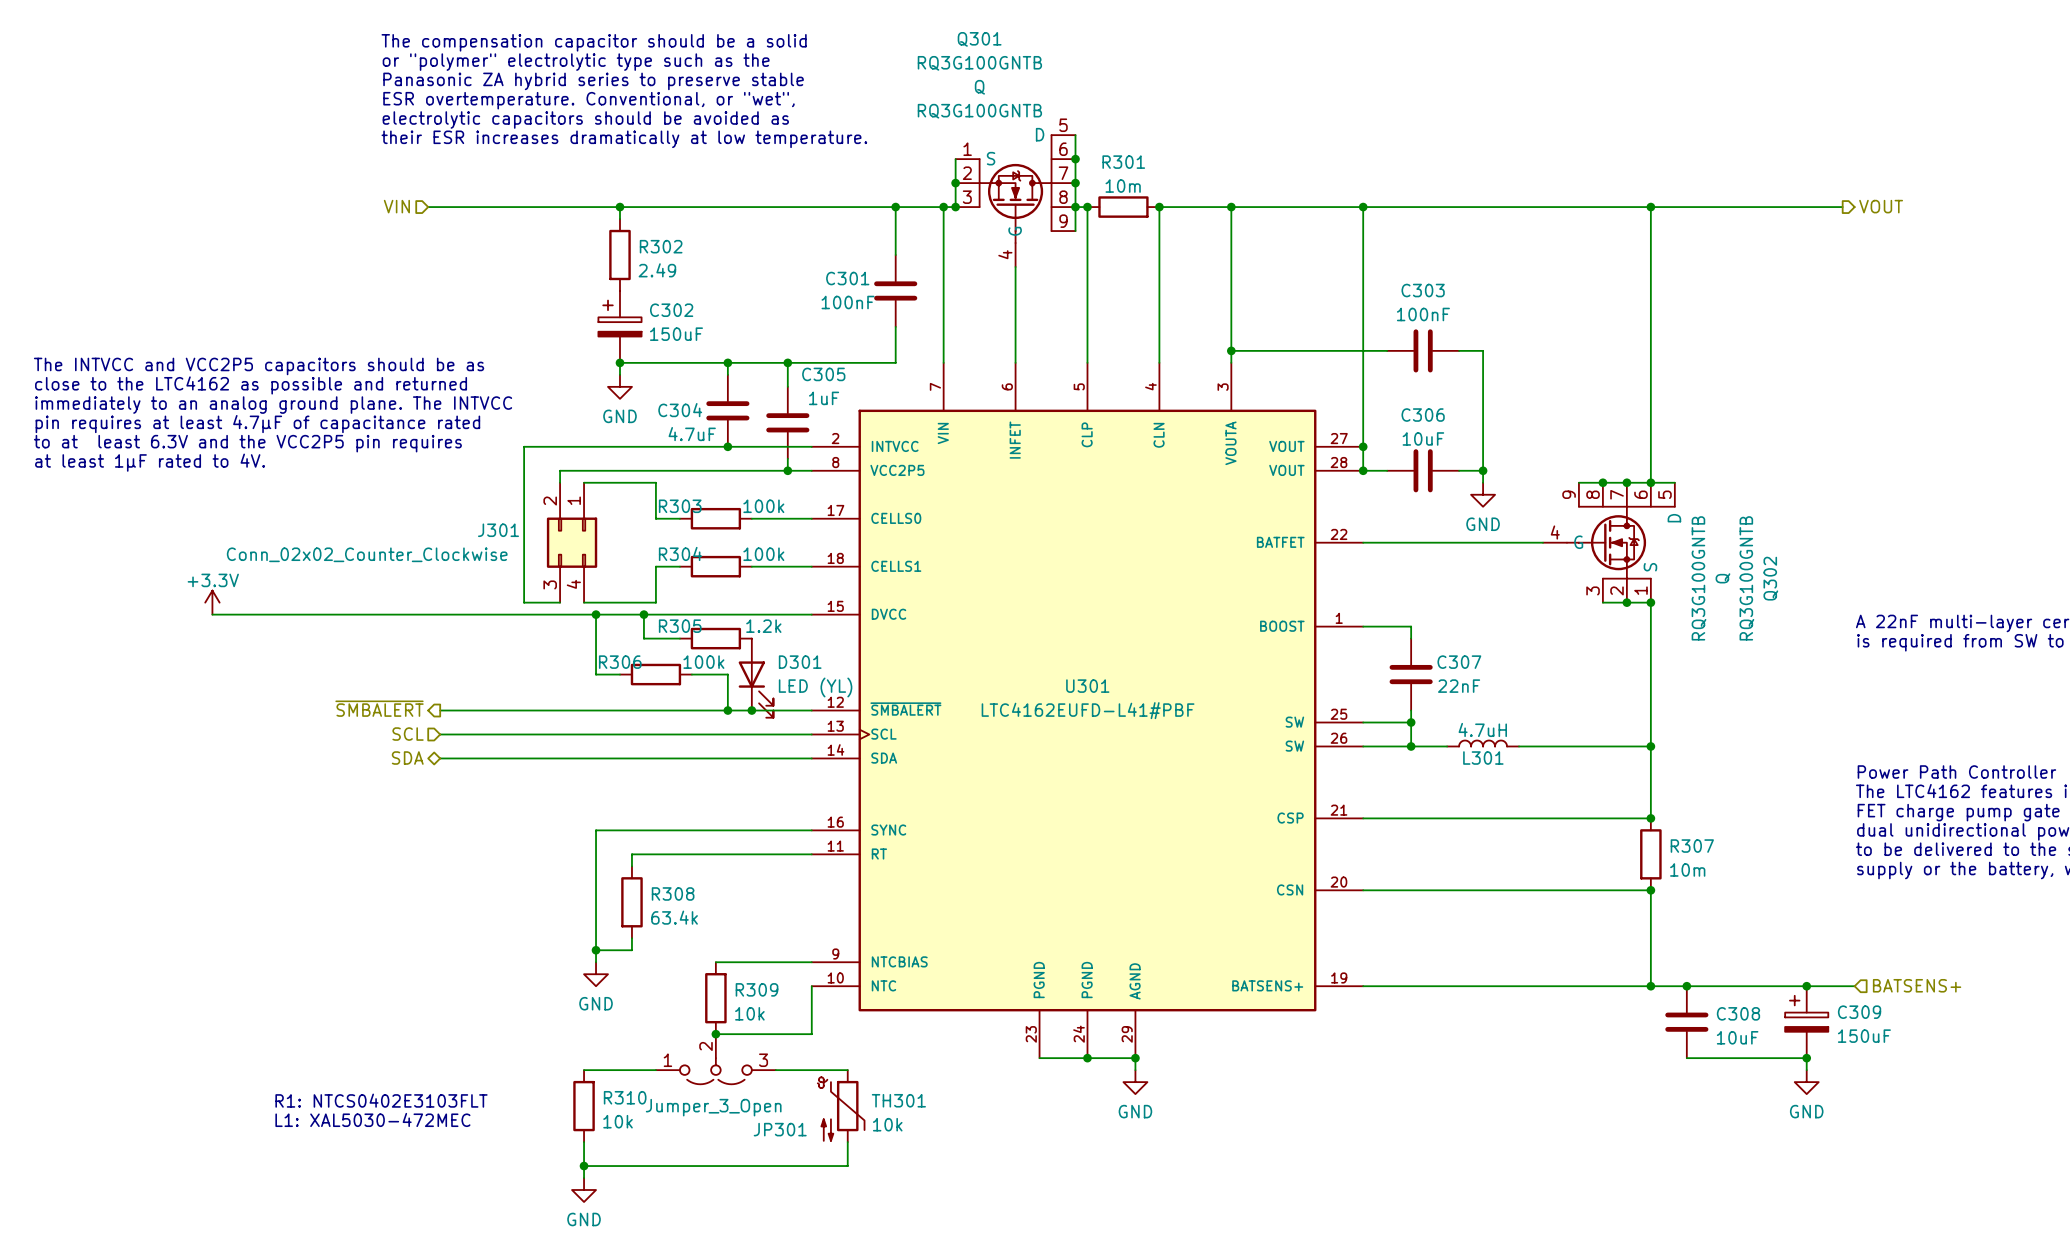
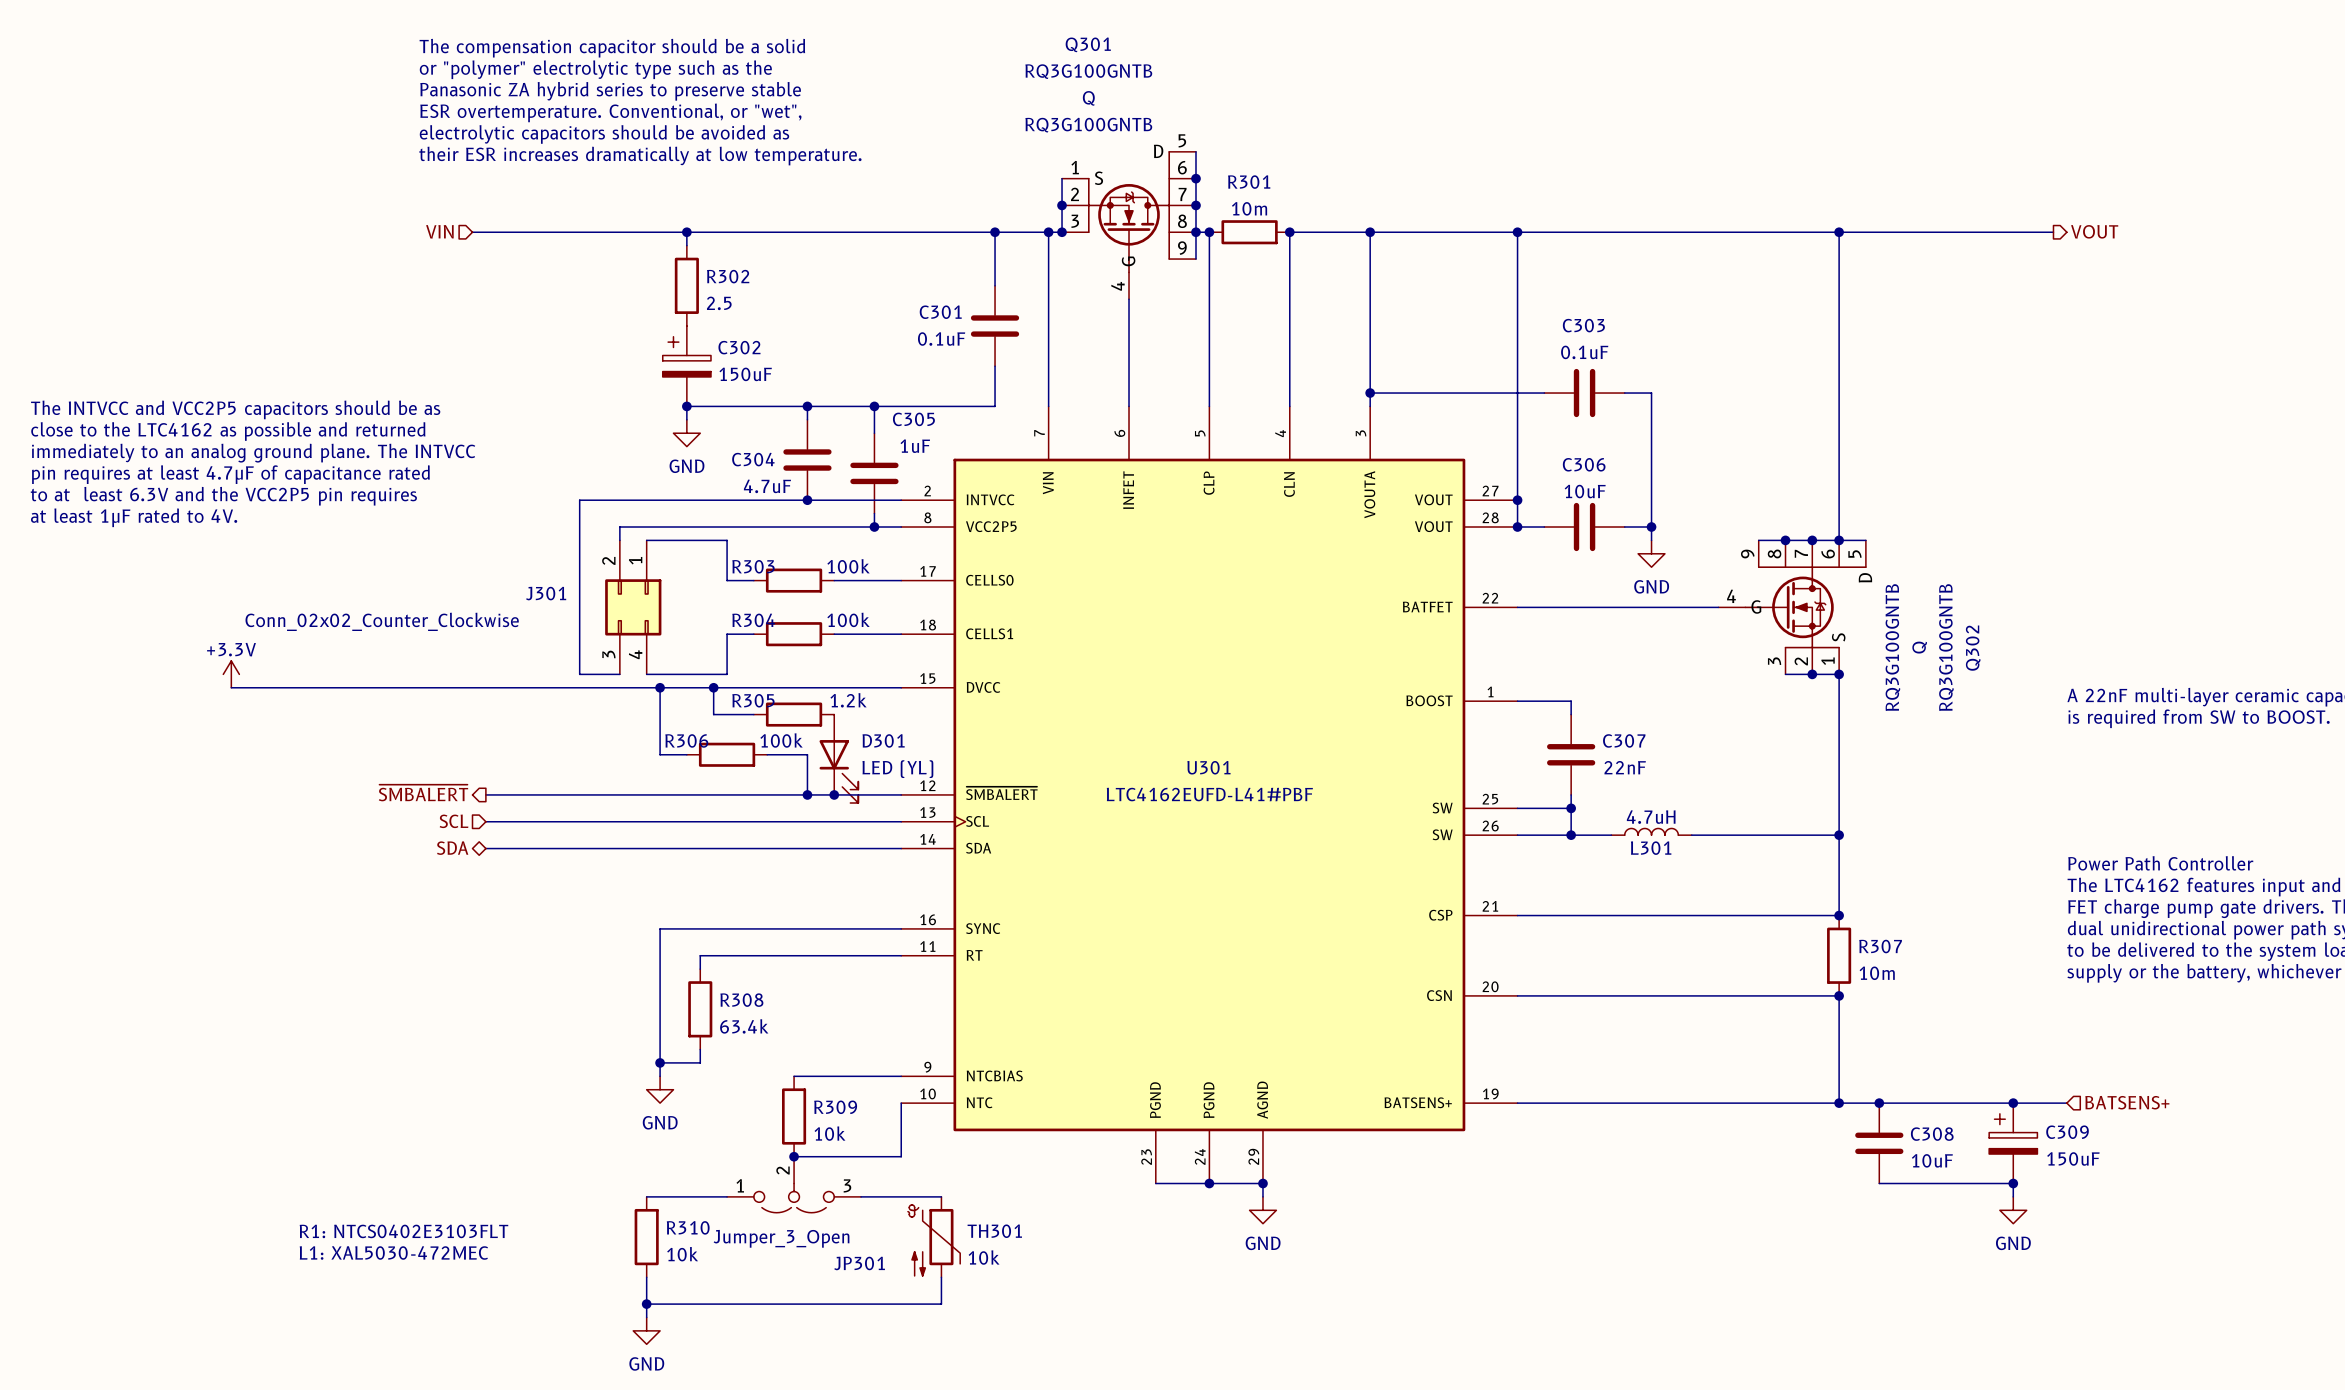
R302 value: 2.49 (657, 270) -> 2.5 (719, 303)
C301 value: 100nF (848, 302) -> 0.1uF (941, 339)
C303 value: 100nF (1423, 314) -> 0.1uF (1584, 352)

